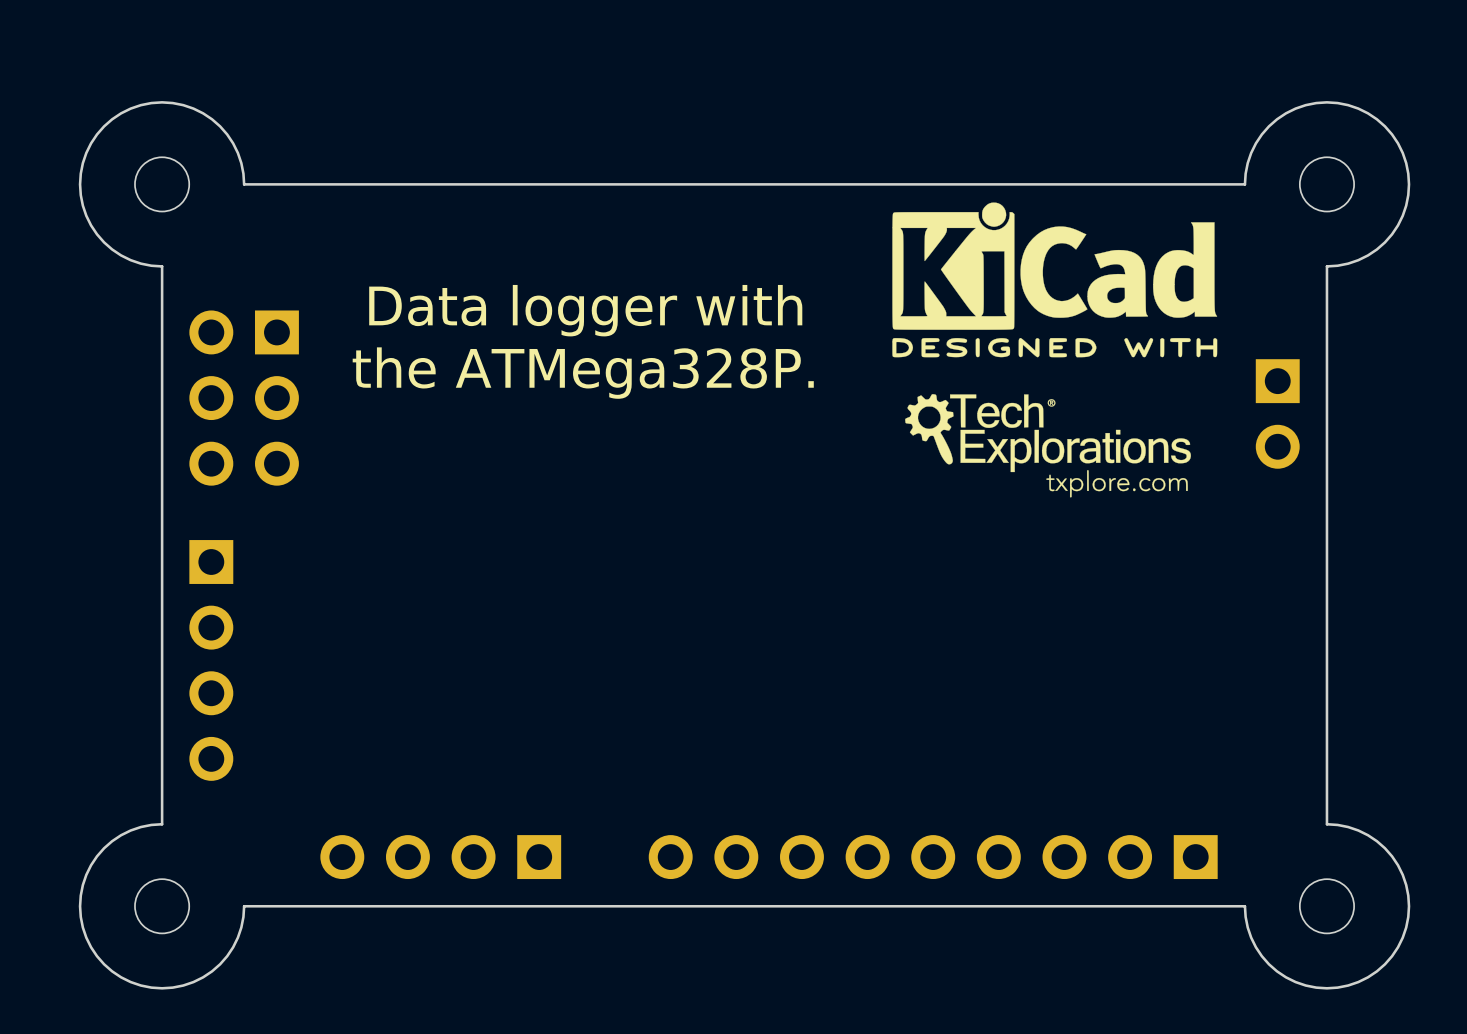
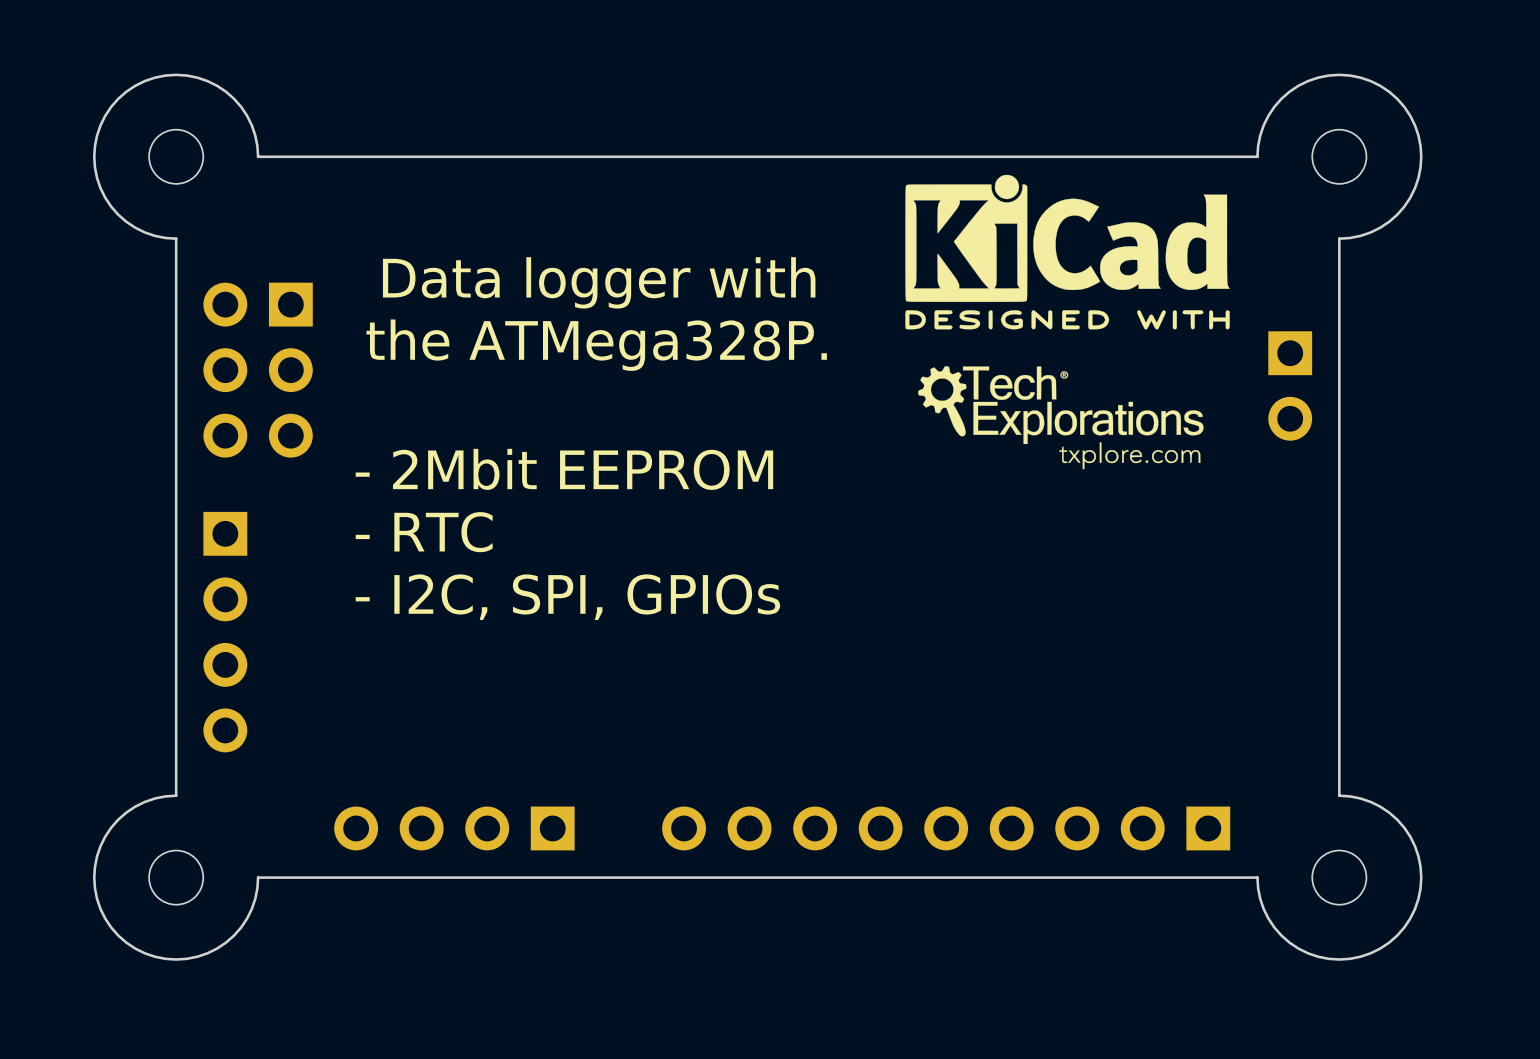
text: none -> - 2Mbit EEPROM (564, 469)
text: none -> - RTC (424, 532)
text: none -> - I2C, SPI, GPIOs (567, 597)

